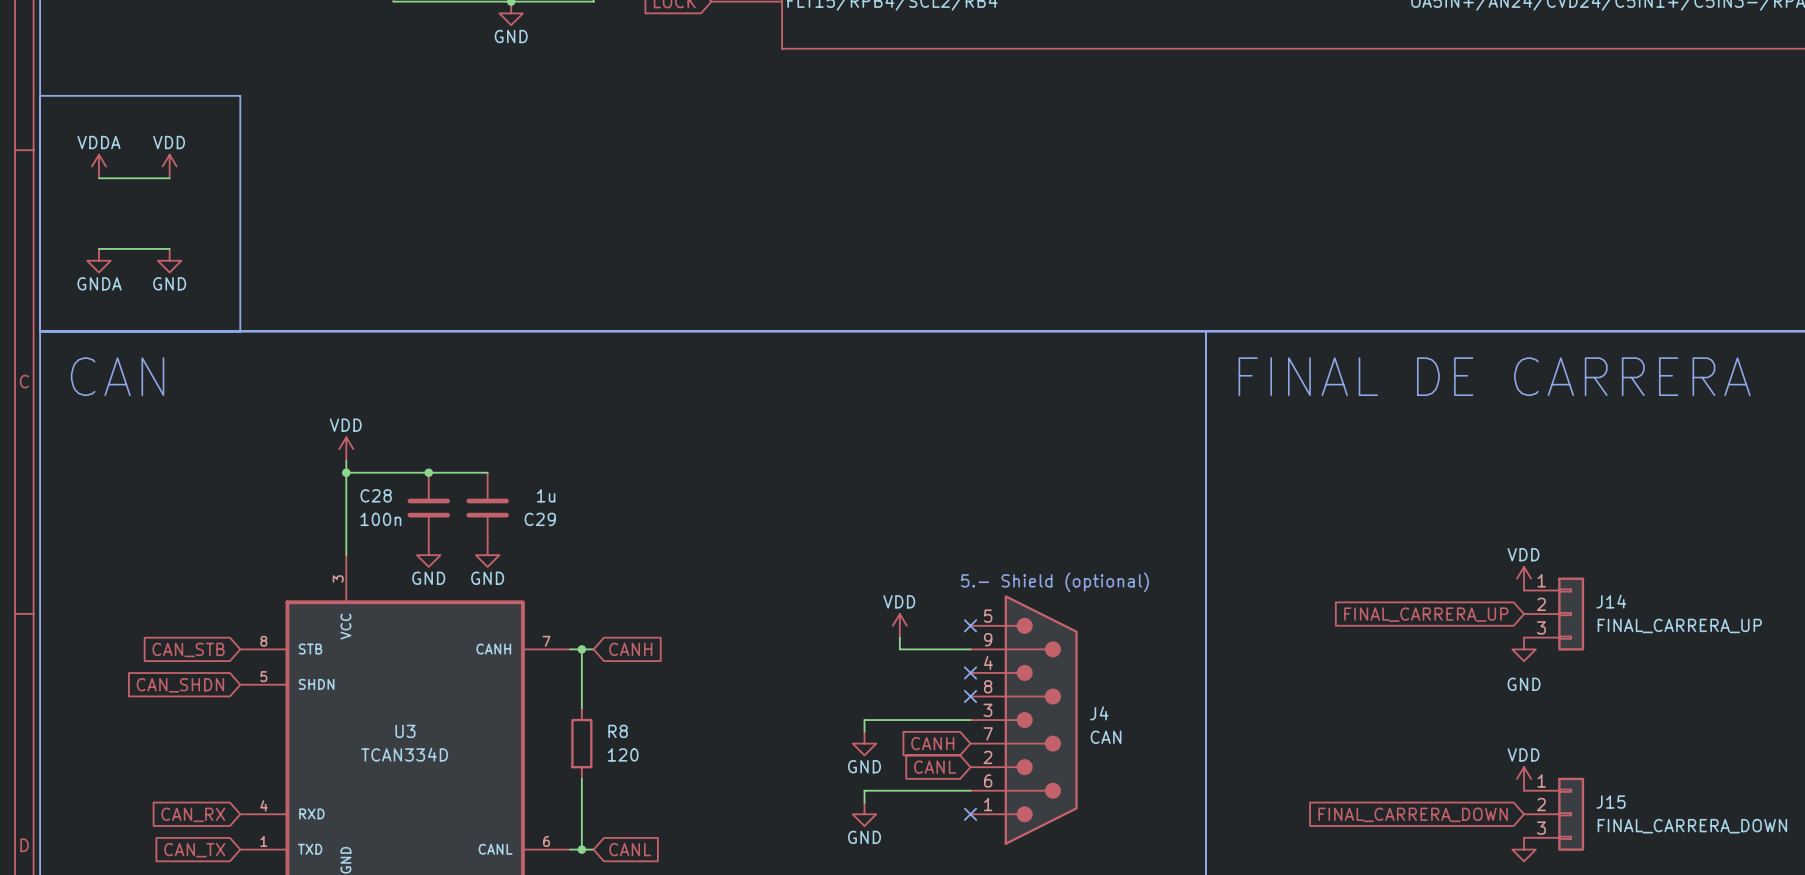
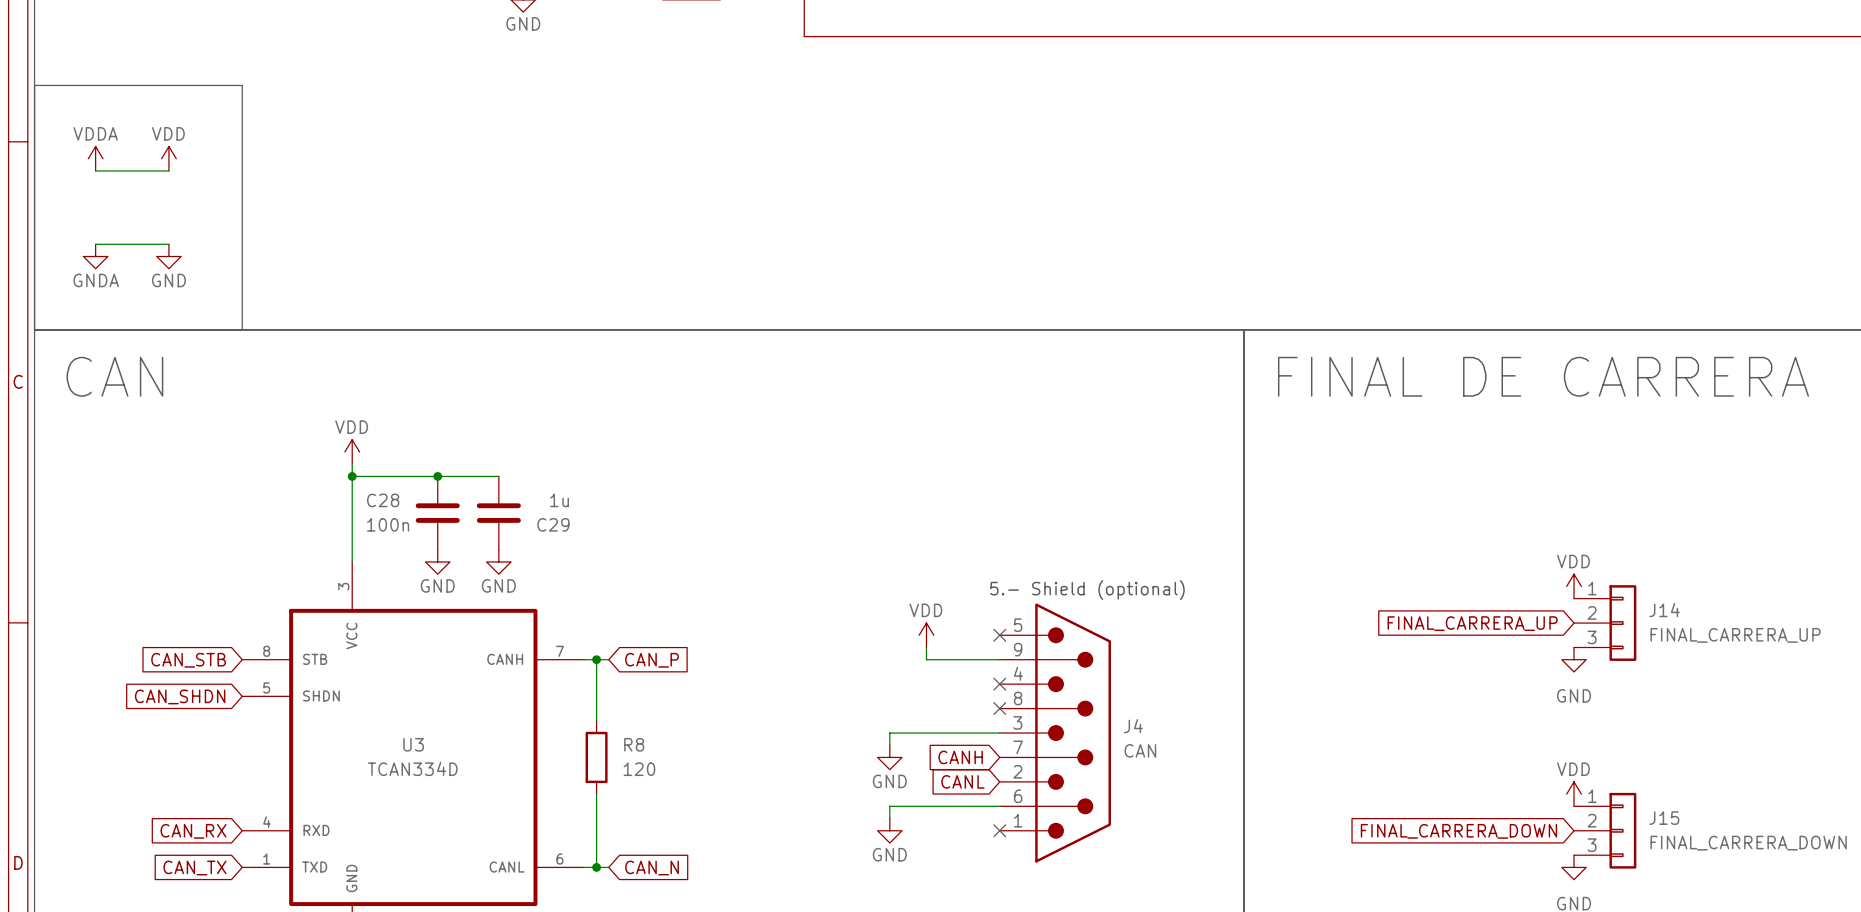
global label: CANH (630, 649) -> CAN_P (652, 660)
global label: CANL (630, 849) -> CAN_N (652, 868)

